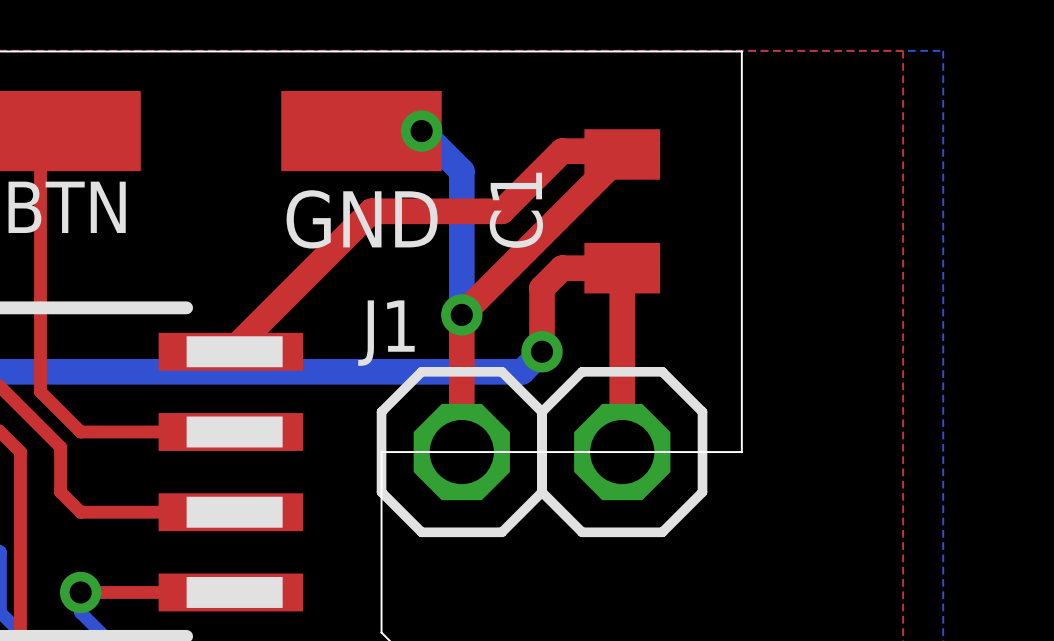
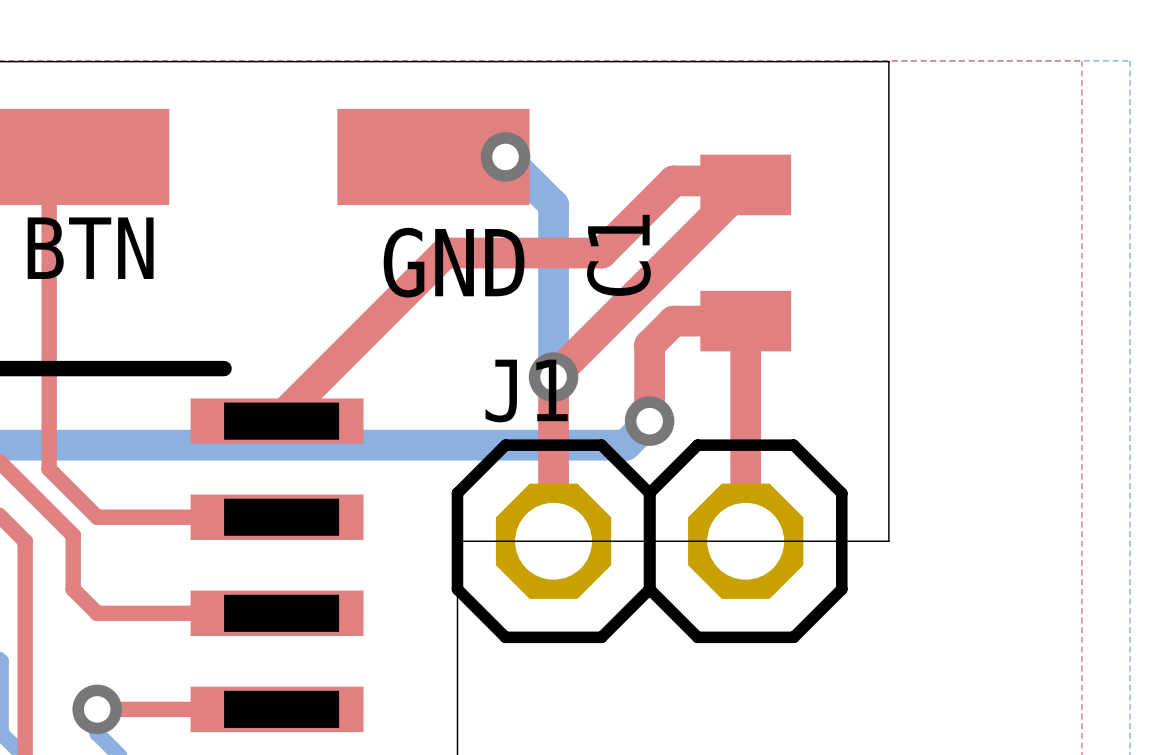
text position: J1 (386, 333) -> J1 (526, 391)

